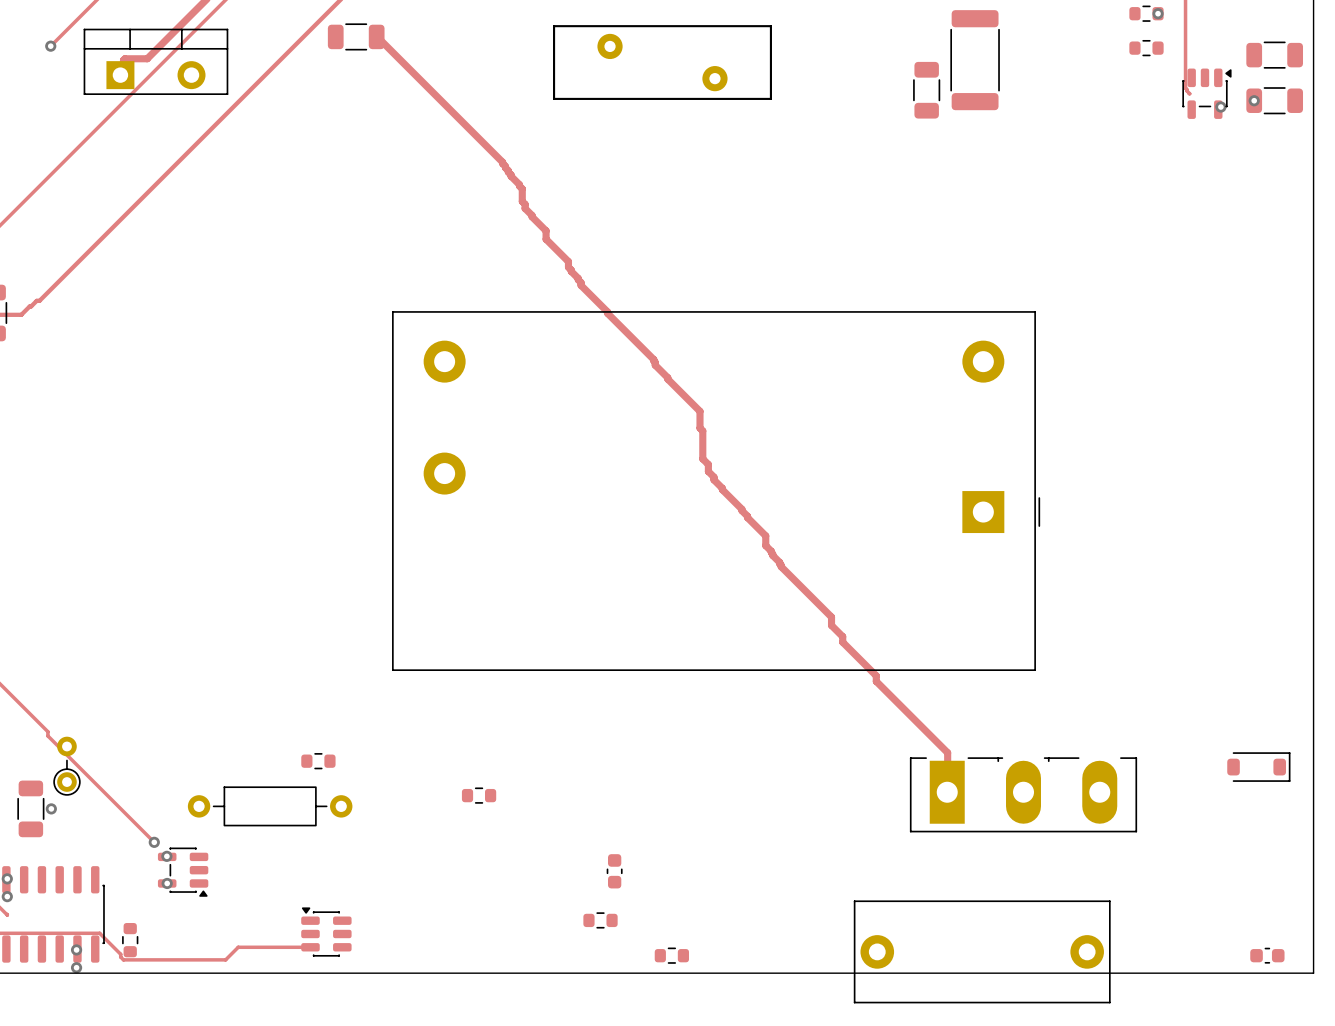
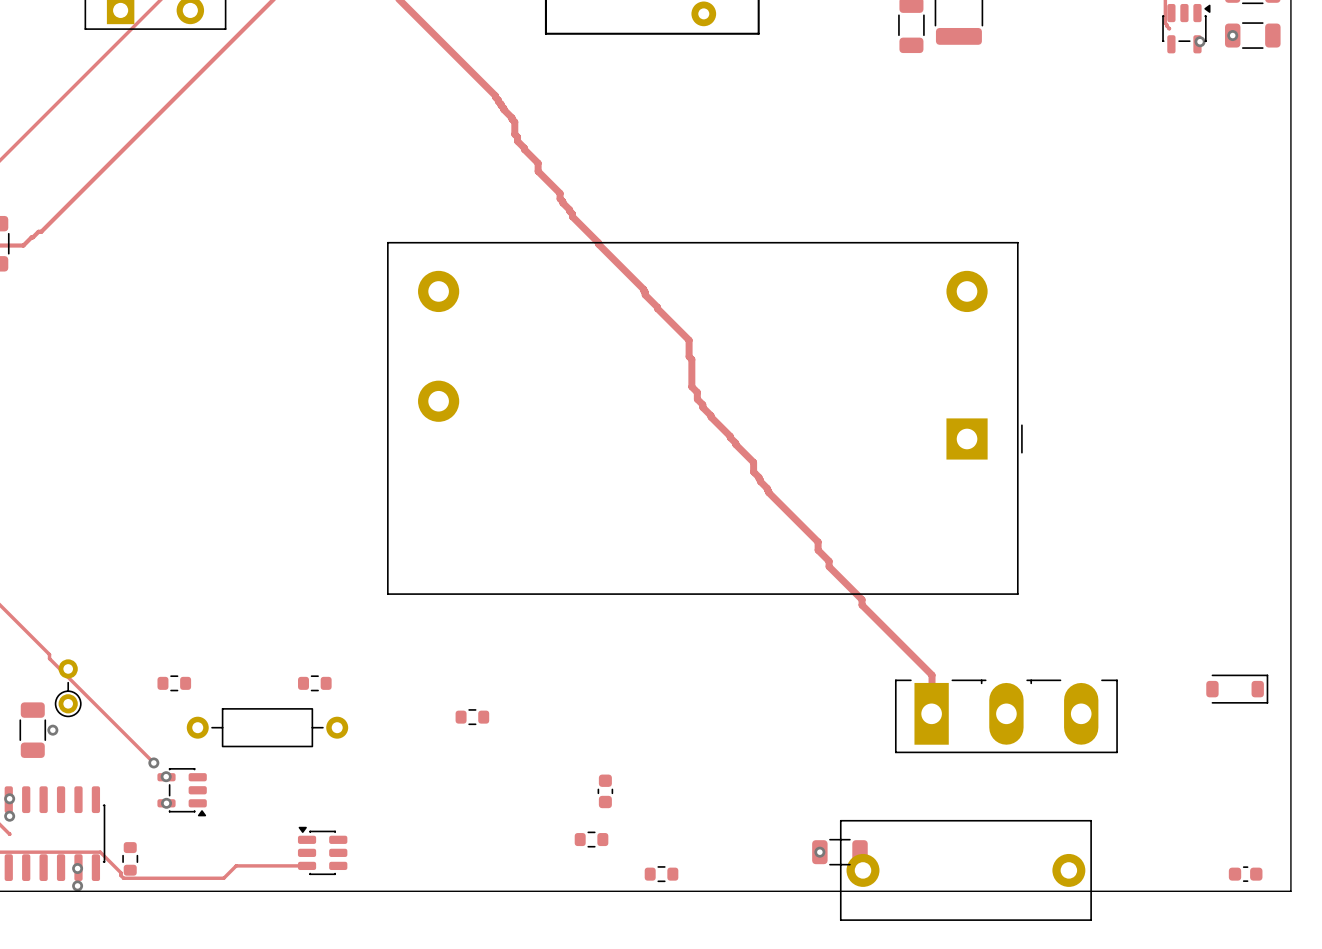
part: none -> (174, 683)
via: none -> (819, 852)
part: none -> (839, 852)

